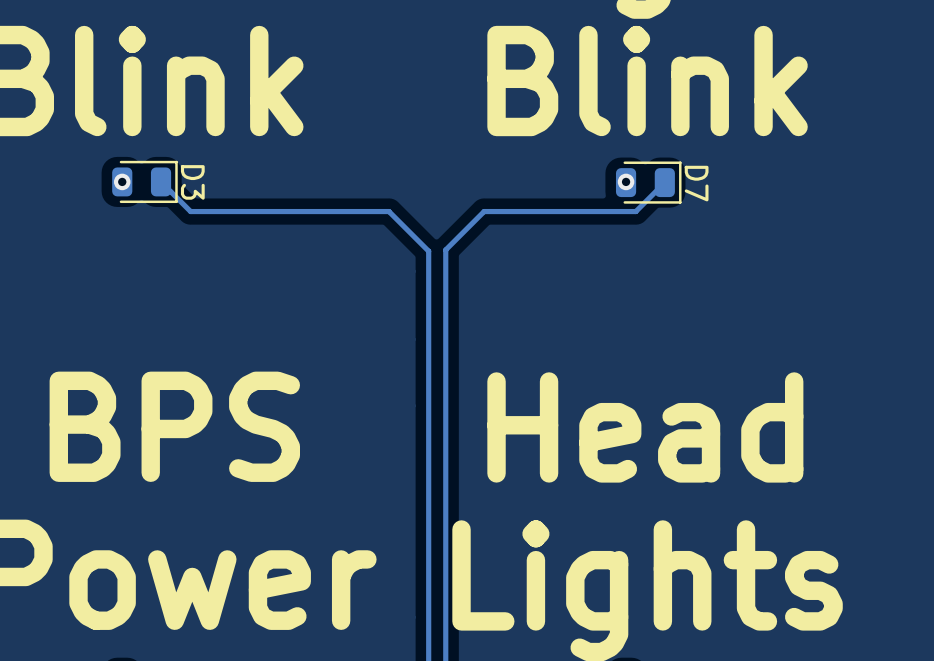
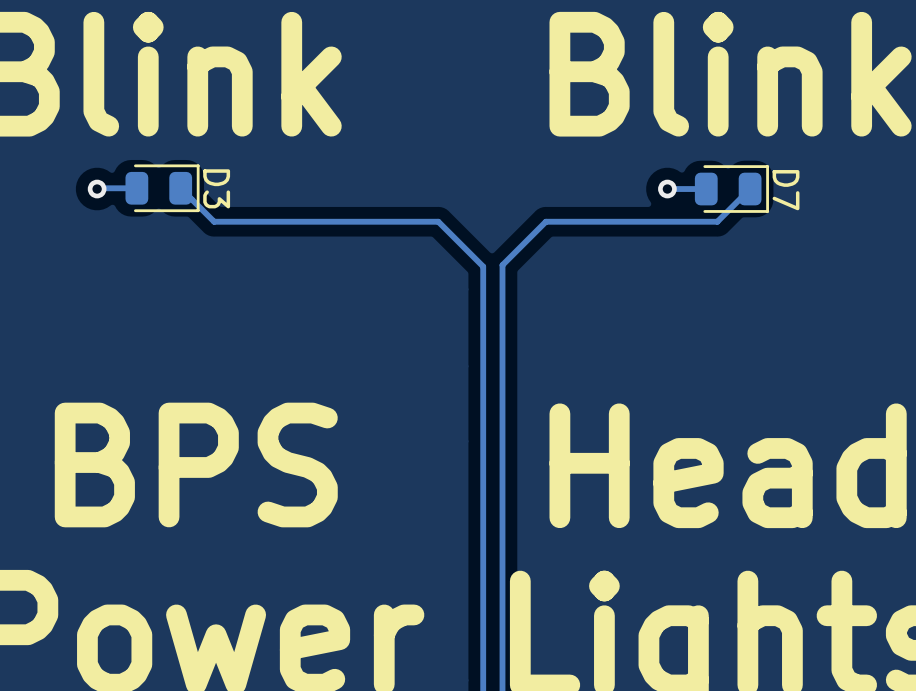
track: none -> (136, 188) (97, 189)
via position: (122, 181) -> (97, 189)
via position: (626, 181) -> (667, 189)
track: none -> (706, 189) (667, 189)

